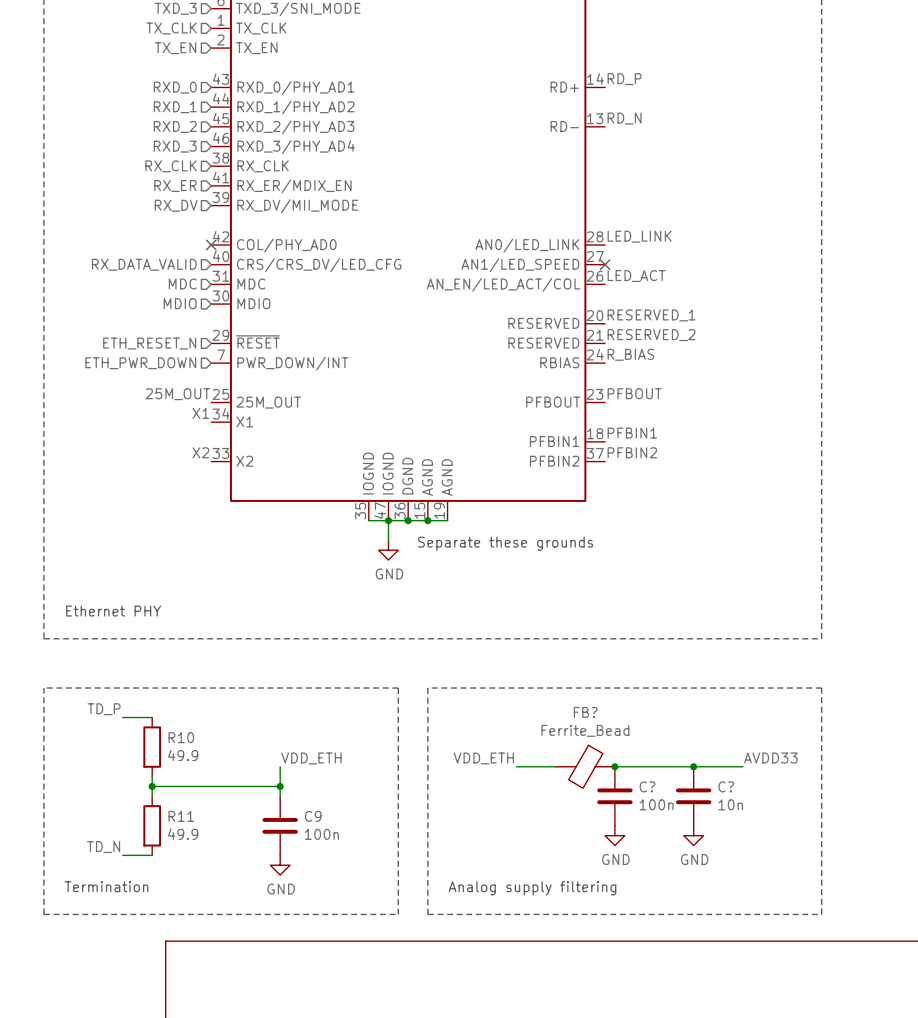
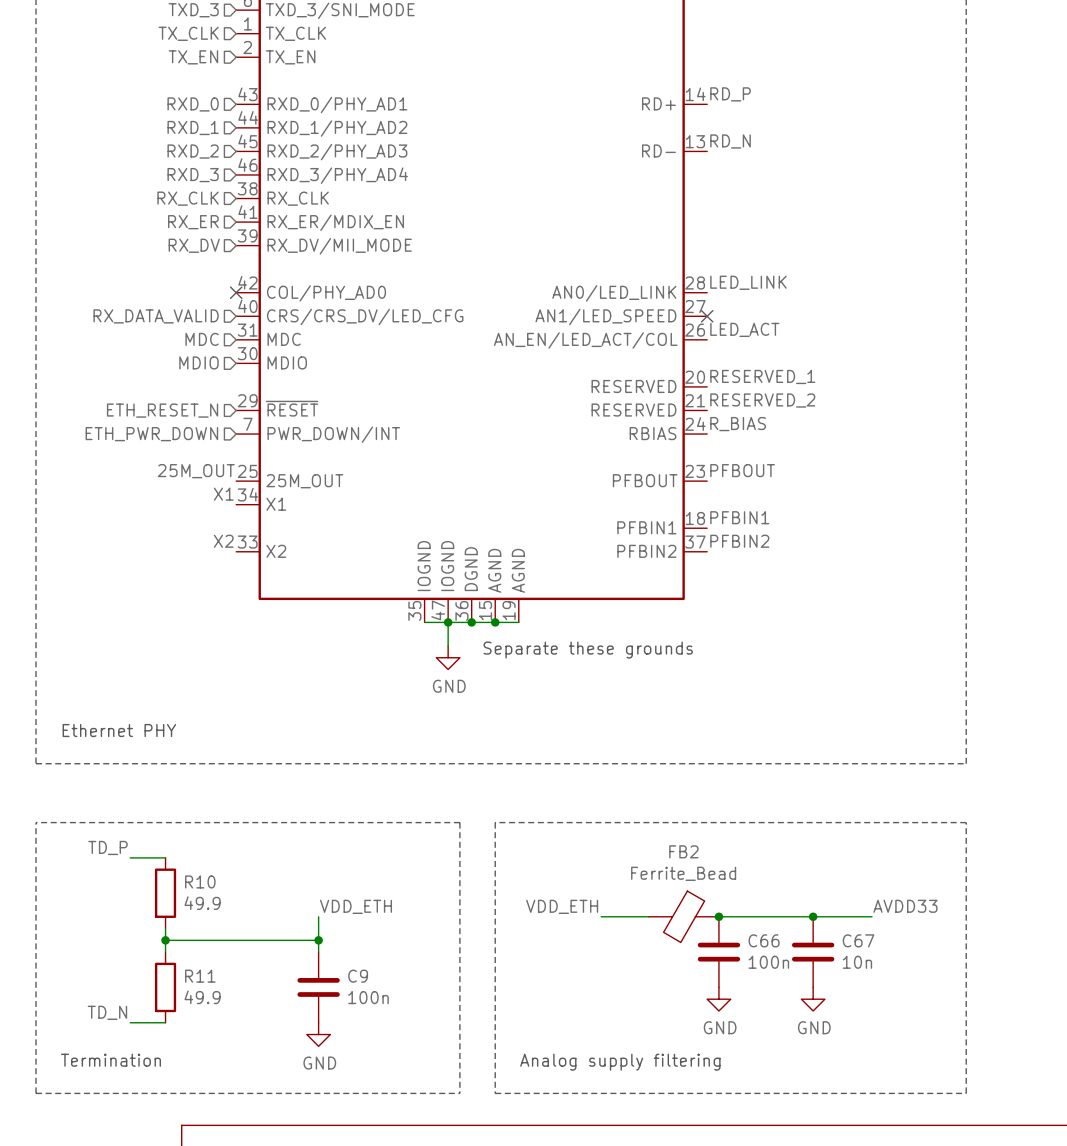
FB? name: FB? (585, 712) -> FB2 (683, 851)
C? name: C? (647, 786) -> C66 (764, 940)
C? name: C? (726, 786) -> C67 (858, 940)

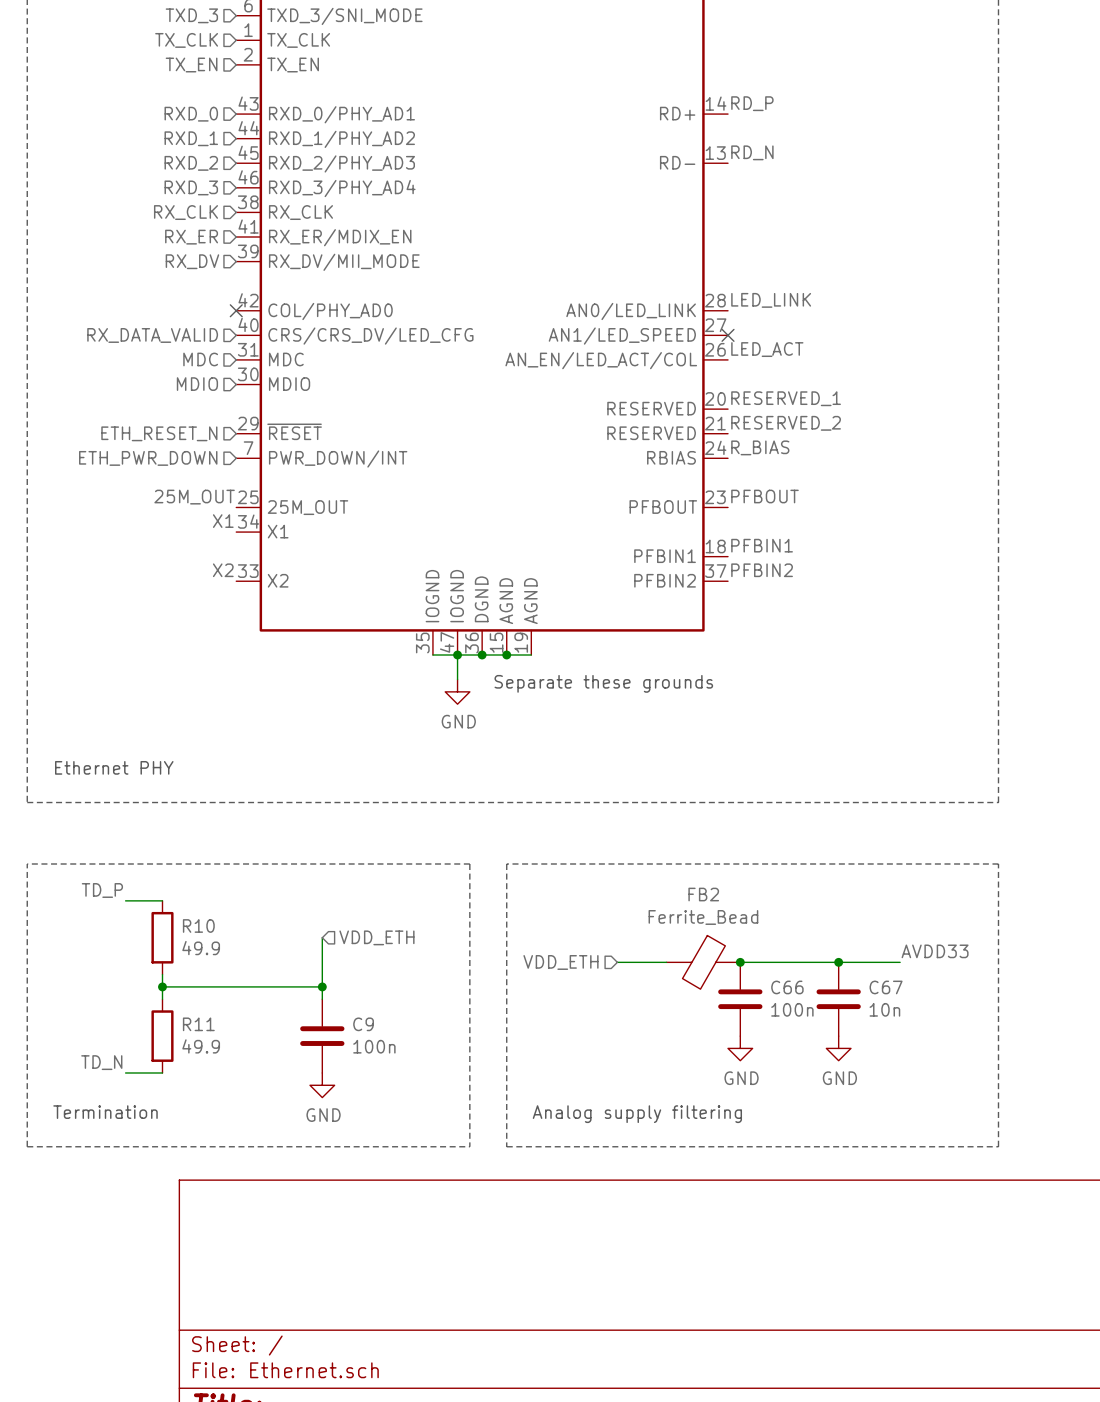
wire: none -> (322, 937) (322, 962)
hierarchical label: none -> VDD_ETH (376, 937)
label: VDD_ETH (355, 906) -> none
label: VDD_ETH (562, 906) -> none
hierarchical label: none -> VDD_ETH (560, 962)

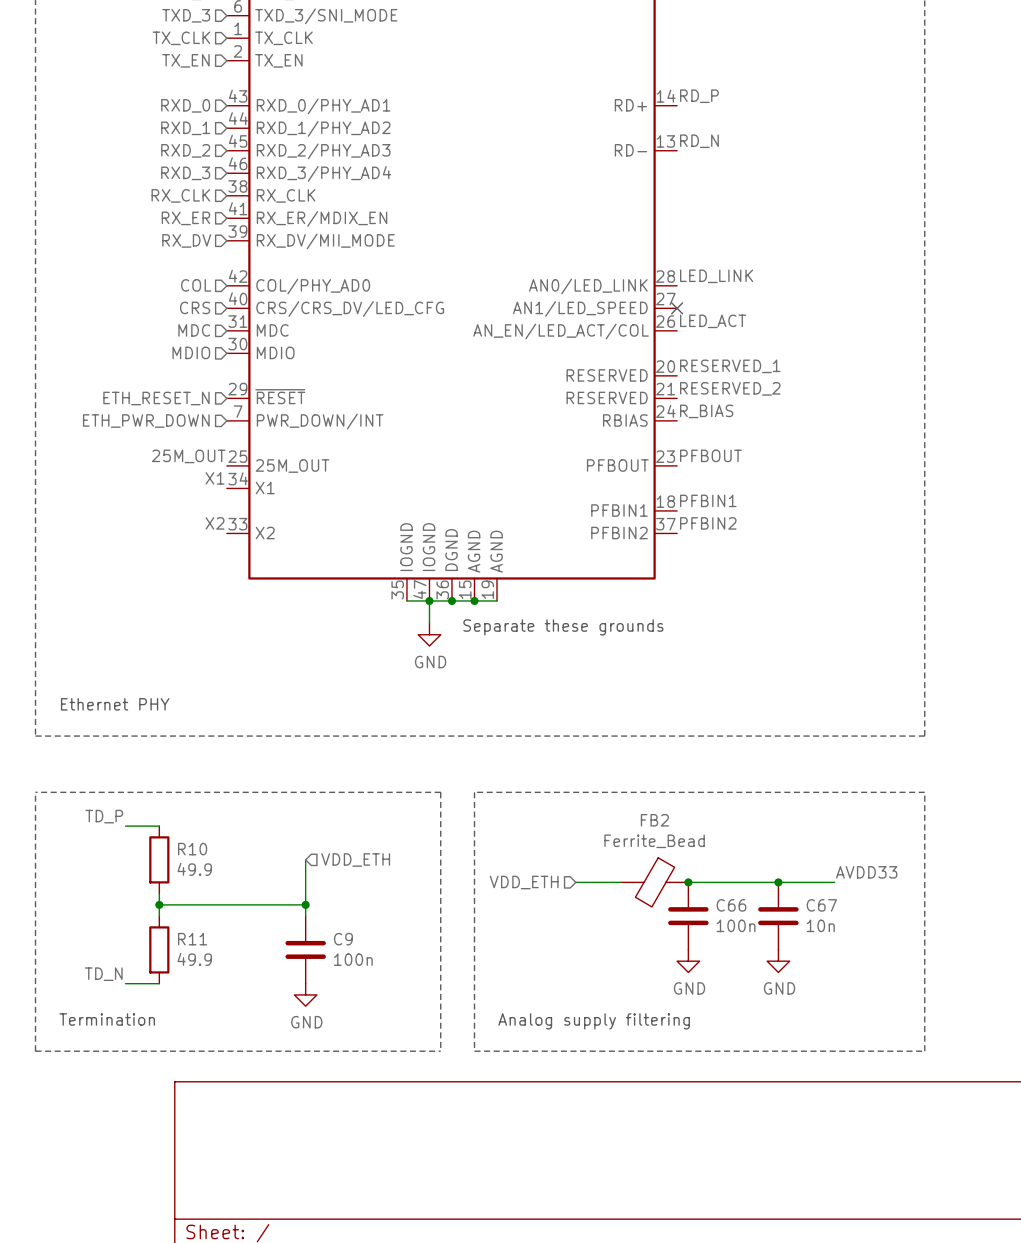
hierarchical label: none -> COL (196, 285)
no-connect mark: (236, 310) -> none
hierarchical label: RX_DATA_VALID (152, 335) -> CRS (195, 307)

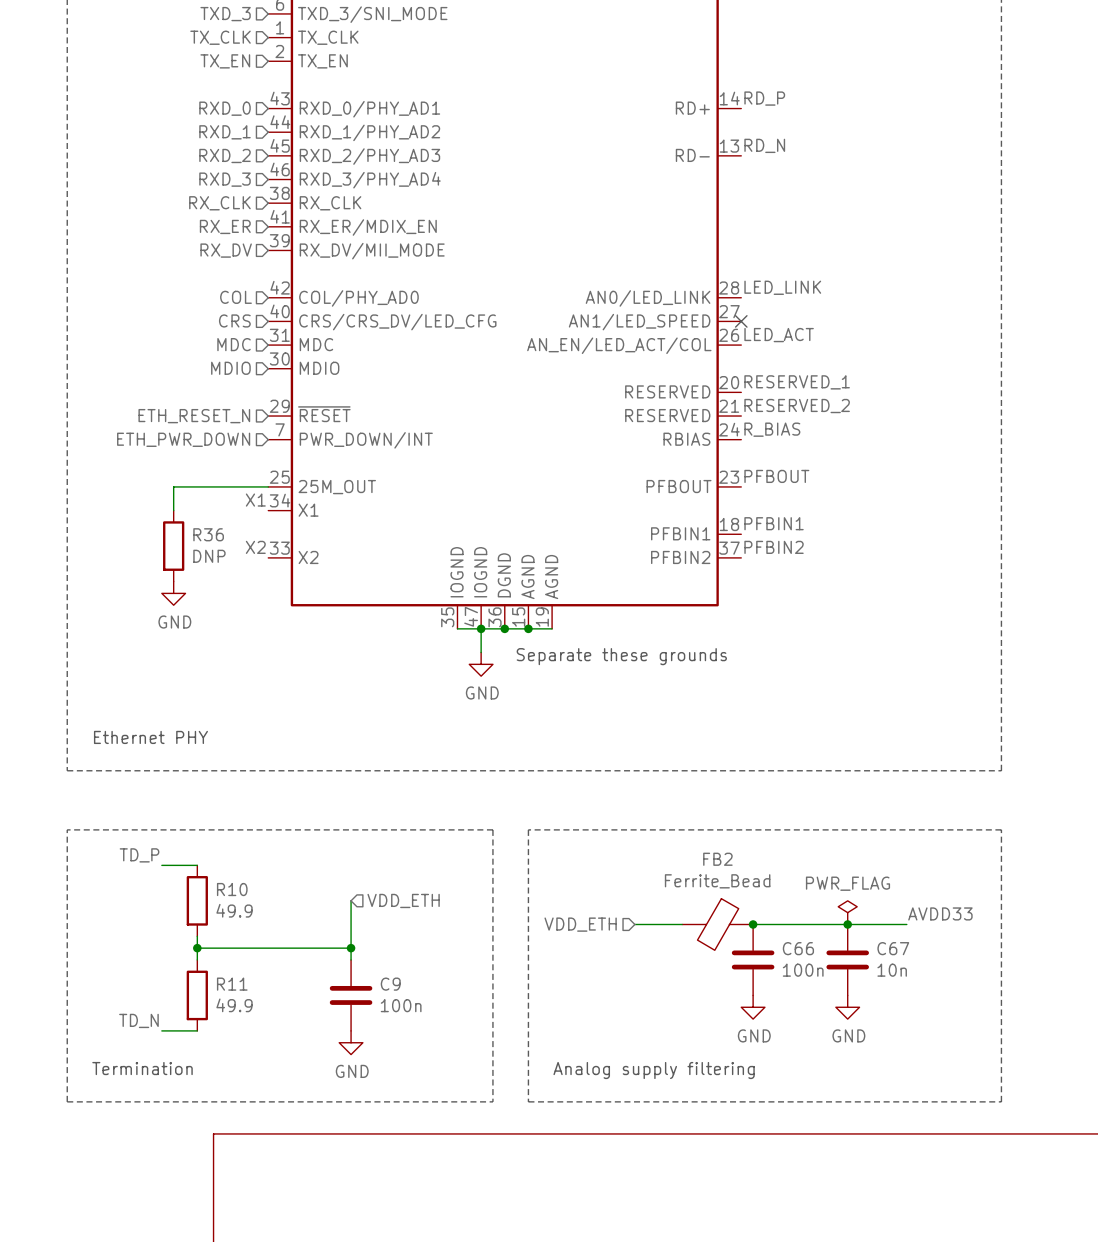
label: 25M_OUT (188, 456) -> none
wire: none -> (268, 486) (173, 486) (173, 510)
R36: none -> DNP (173, 546)
power symbol: none -> GND (173, 593)
power symbol: none -> PWR_FLAG (847, 912)

